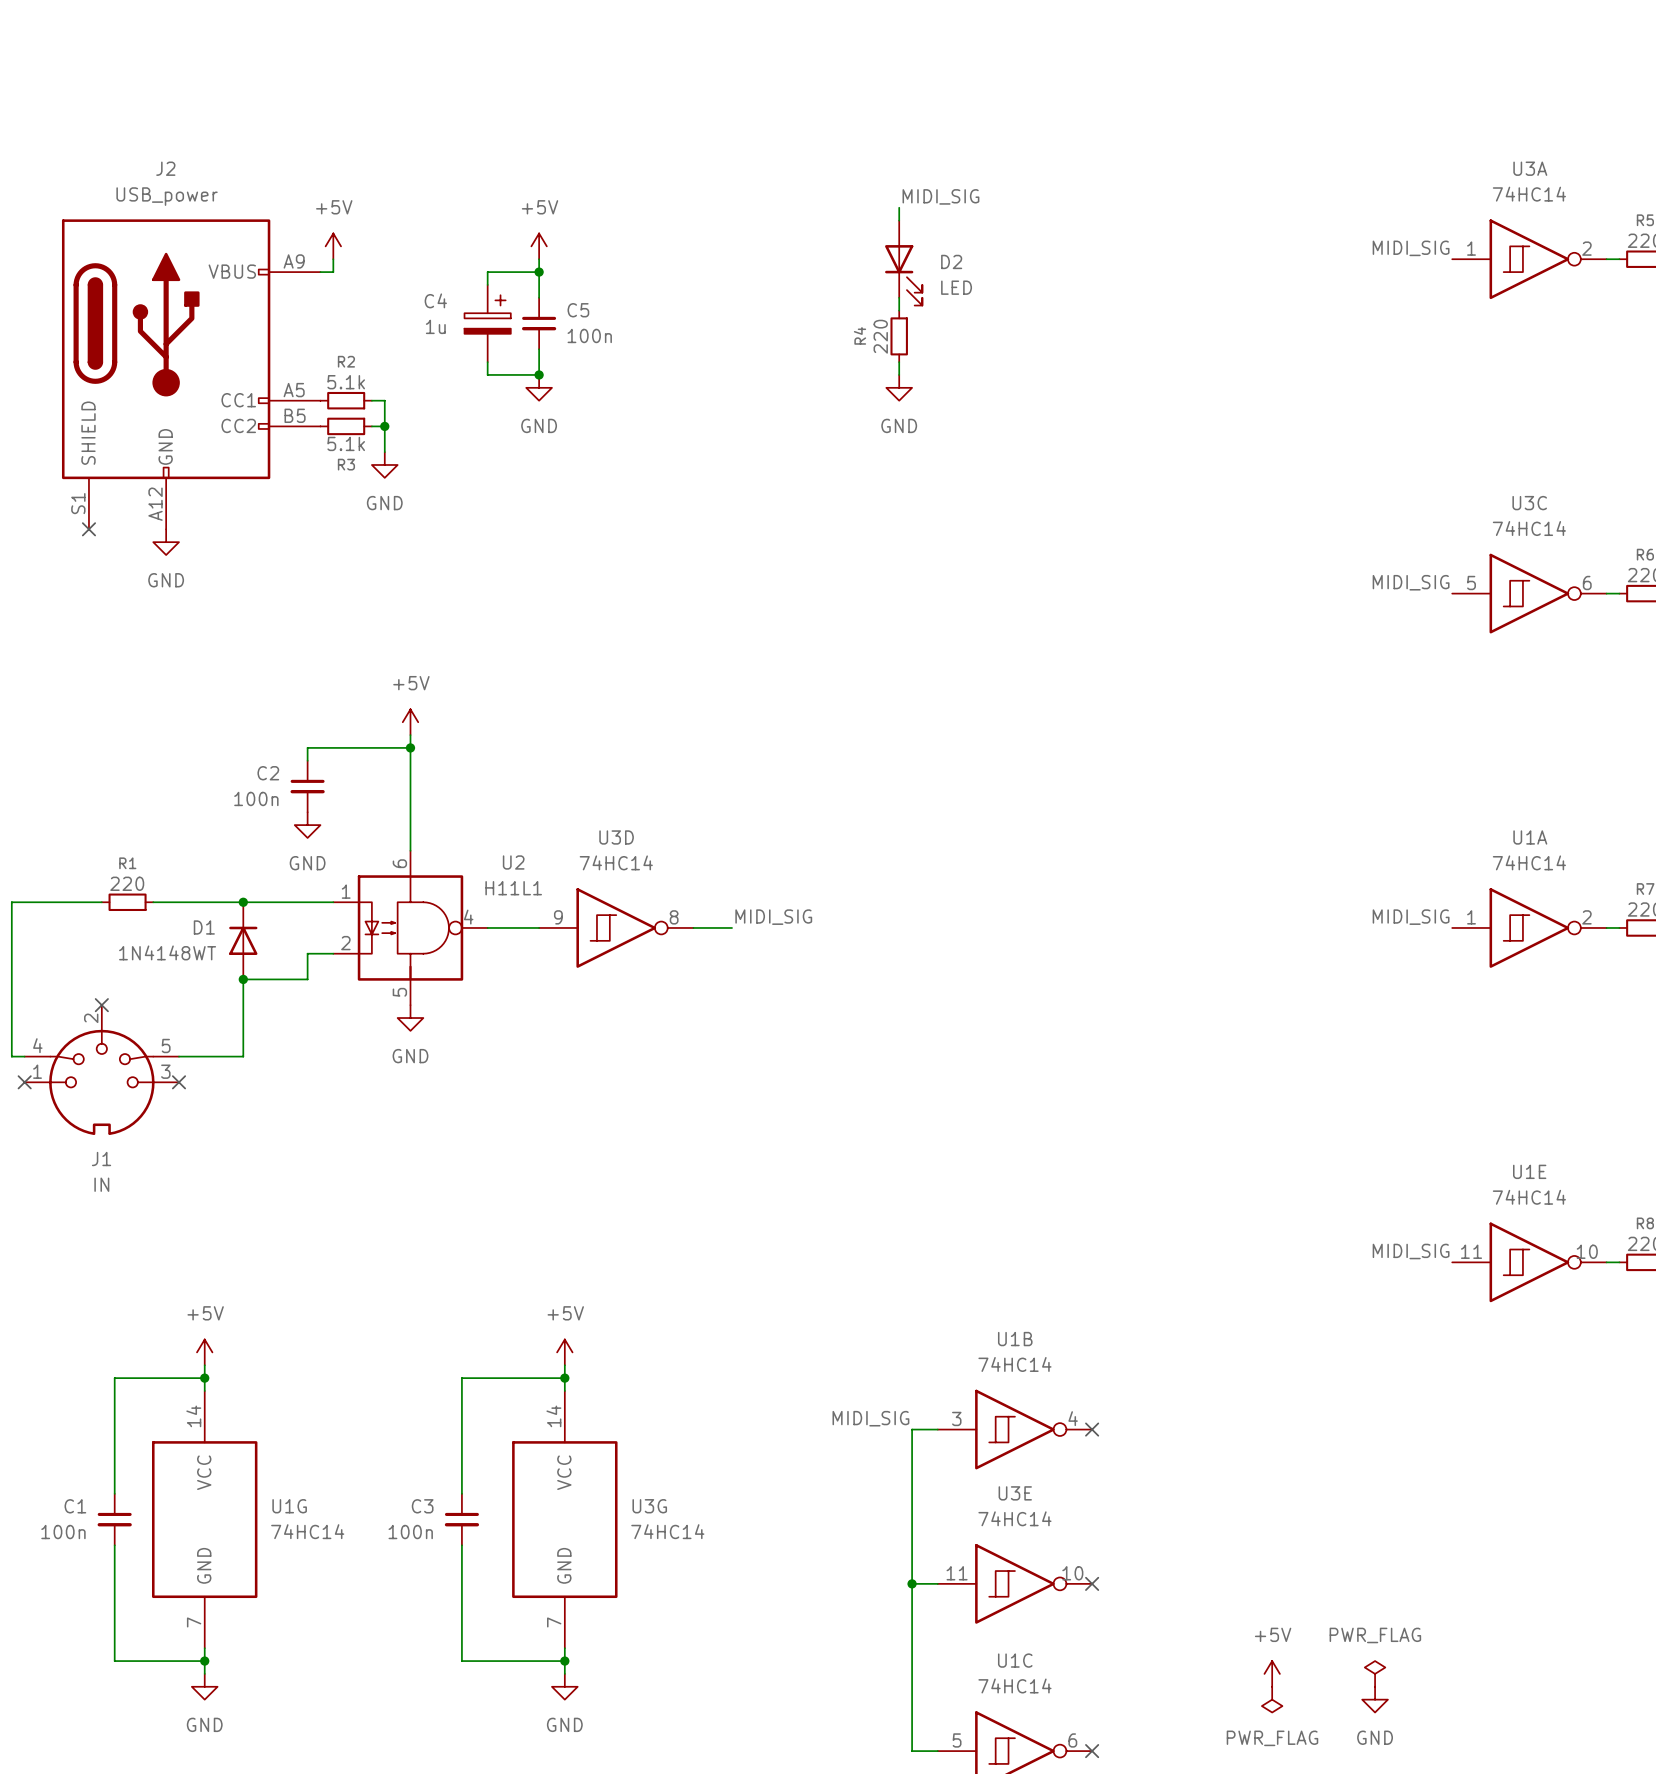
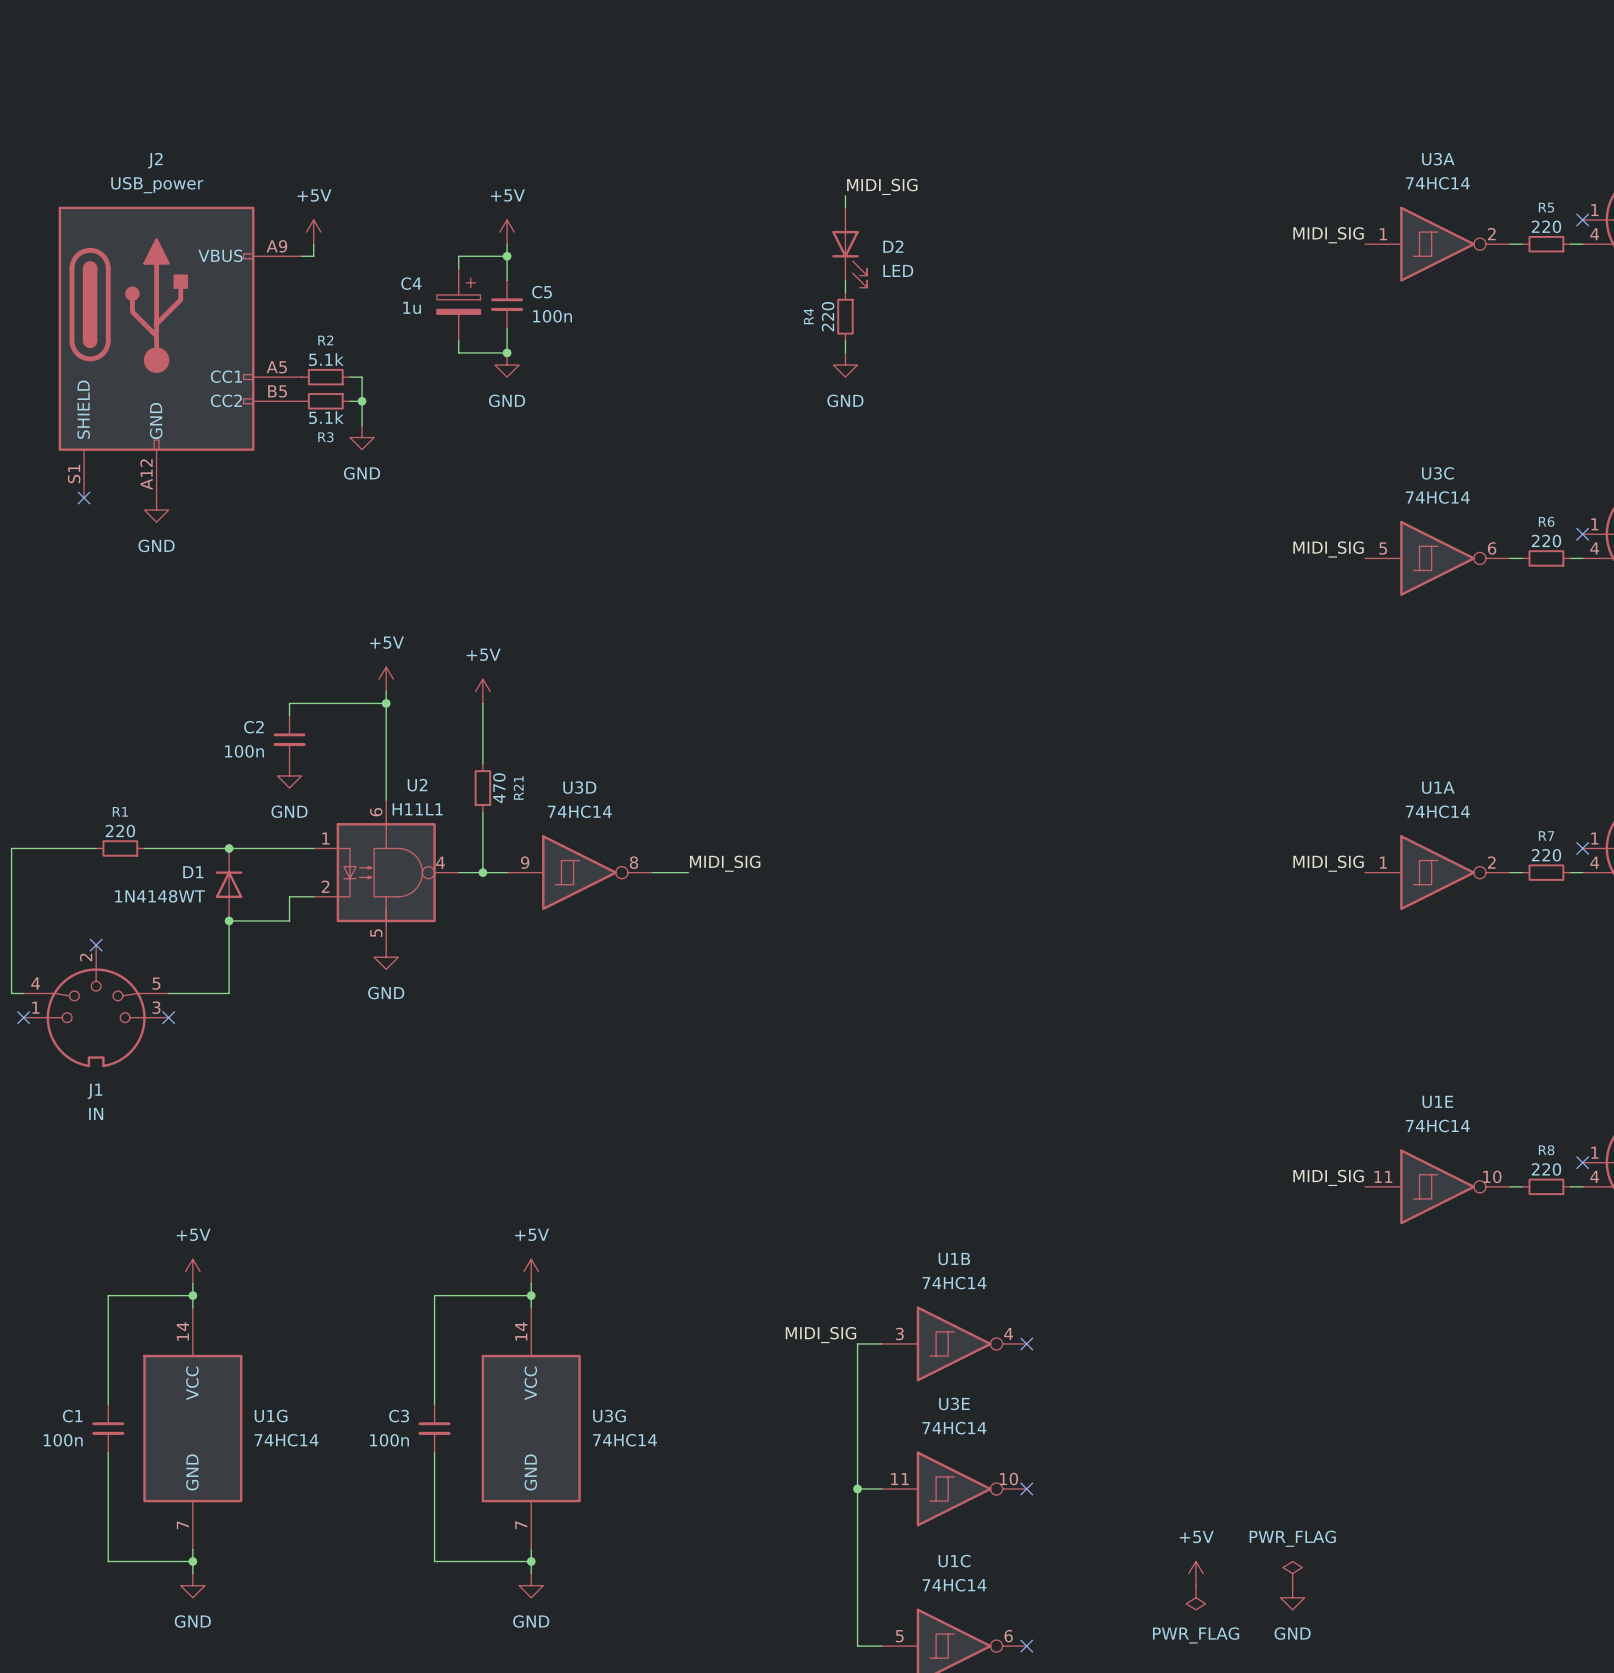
power symbol: none -> +5V (482, 691)
wire: none -> (482, 703) (482, 763)
R21: none -> 470 (482, 788)
U2 name position: U2 (513, 862) -> U2 (417, 785)
wire: none -> (482, 812) (482, 872)
U2 value position: H11L1 (513, 888) -> H11L1 (417, 809)
junction: none -> (482, 872)

